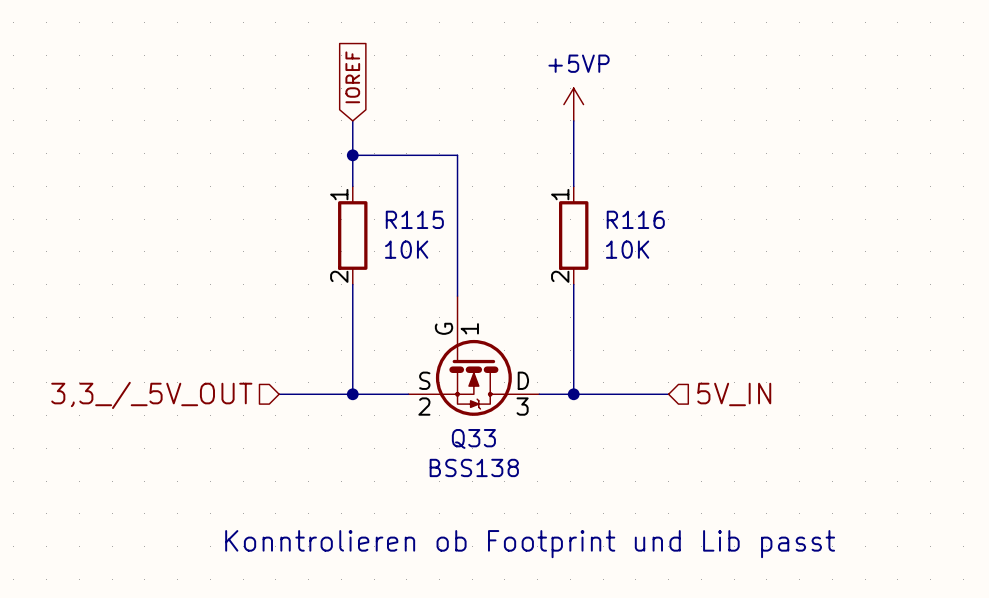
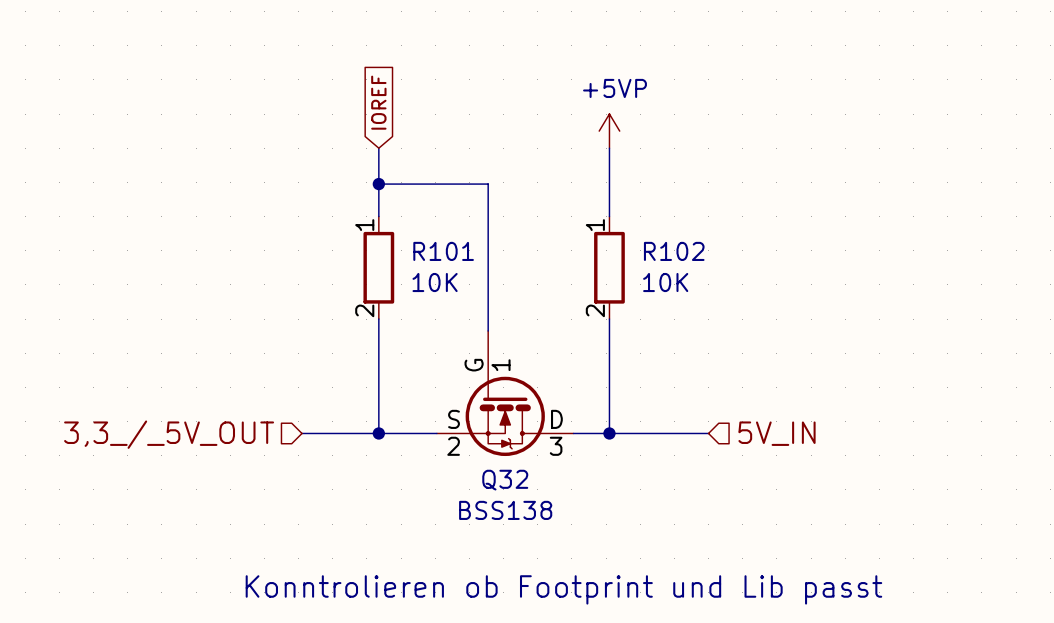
R115 name: R115 (414, 219) -> R101 (443, 251)
R116 name: R116 (635, 219) -> R102 (674, 251)
Q33 name: Q33 (473, 438) -> Q32 (505, 480)

